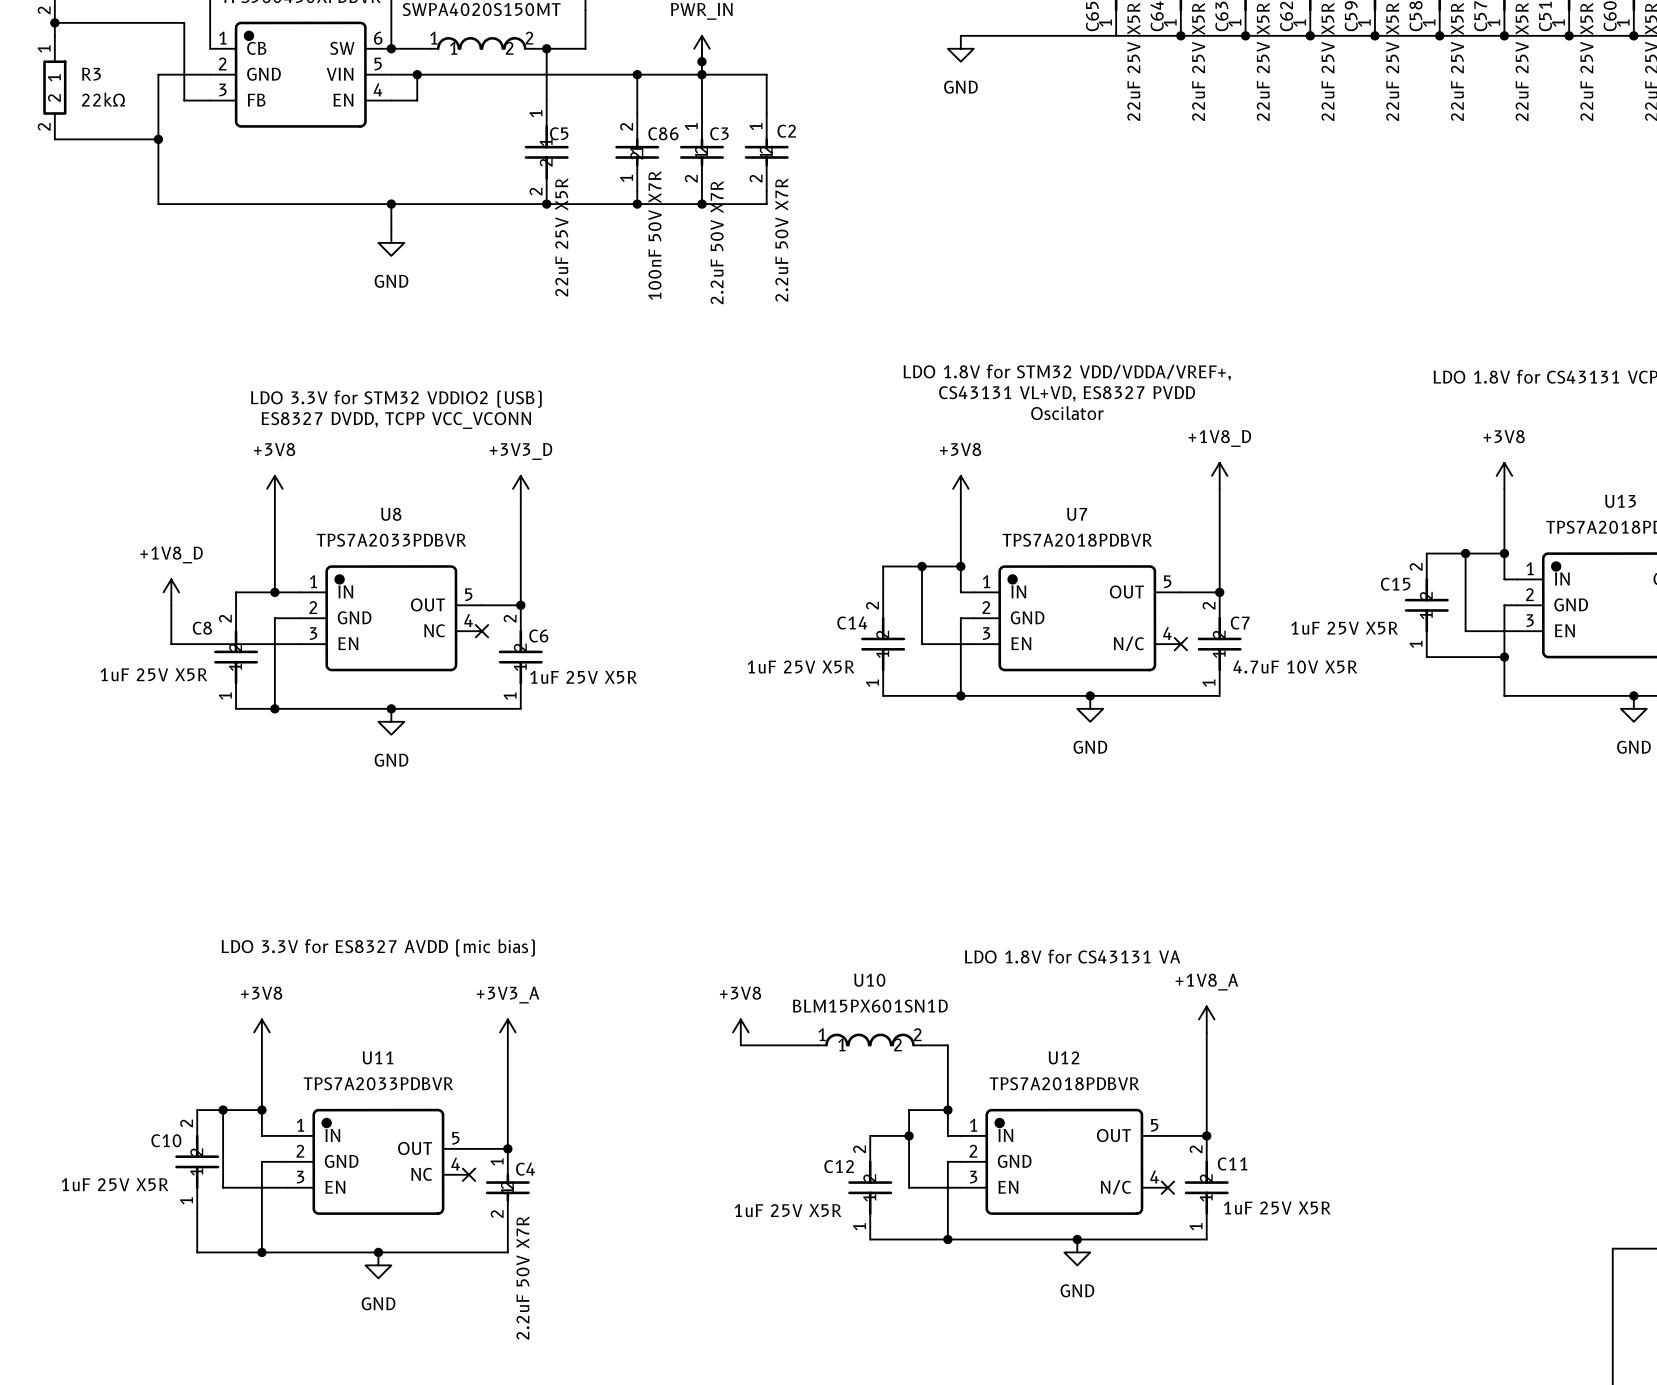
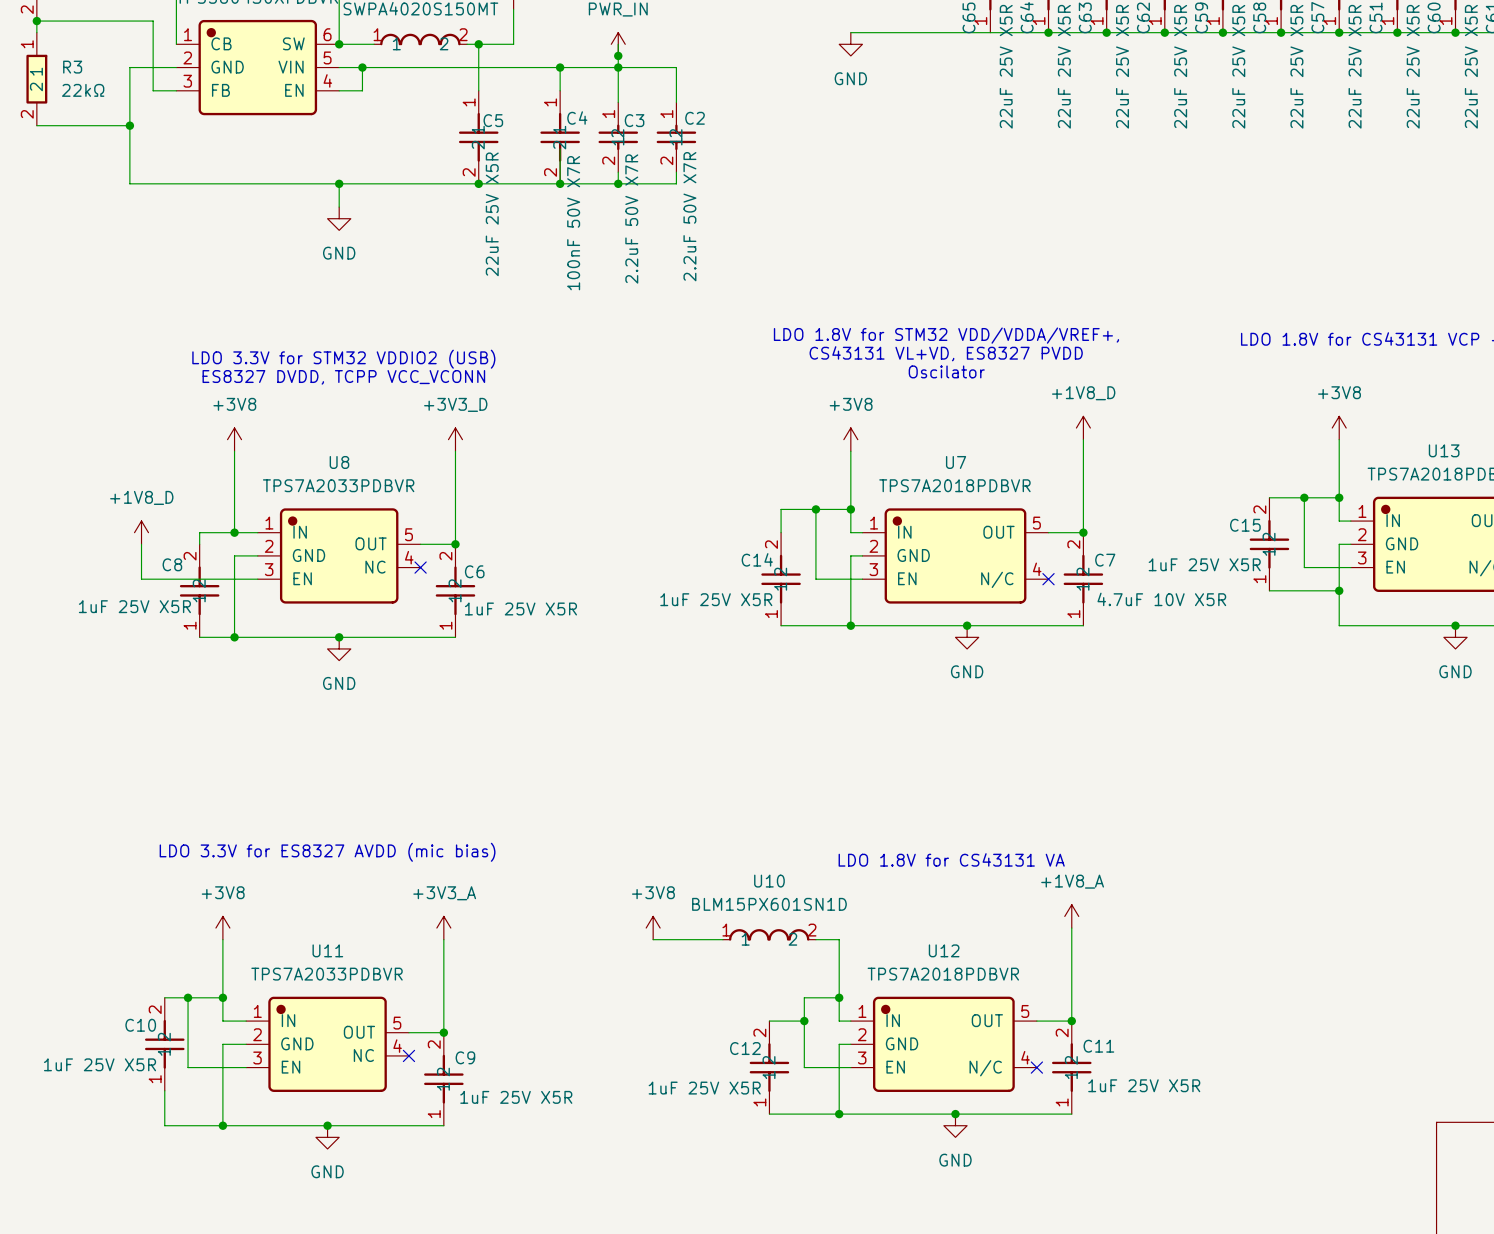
C86: 100nF 50V X7R (637, 152) -> none
C4 symbol: [485, 1148, 530, 1227] -> [540, 90, 580, 184]
C9: none -> 1uF 25V X5R (443, 1079)
C4 value: 2.2uF 50V X7R (522, 1277) -> 100nF 50V X7R (573, 223)

